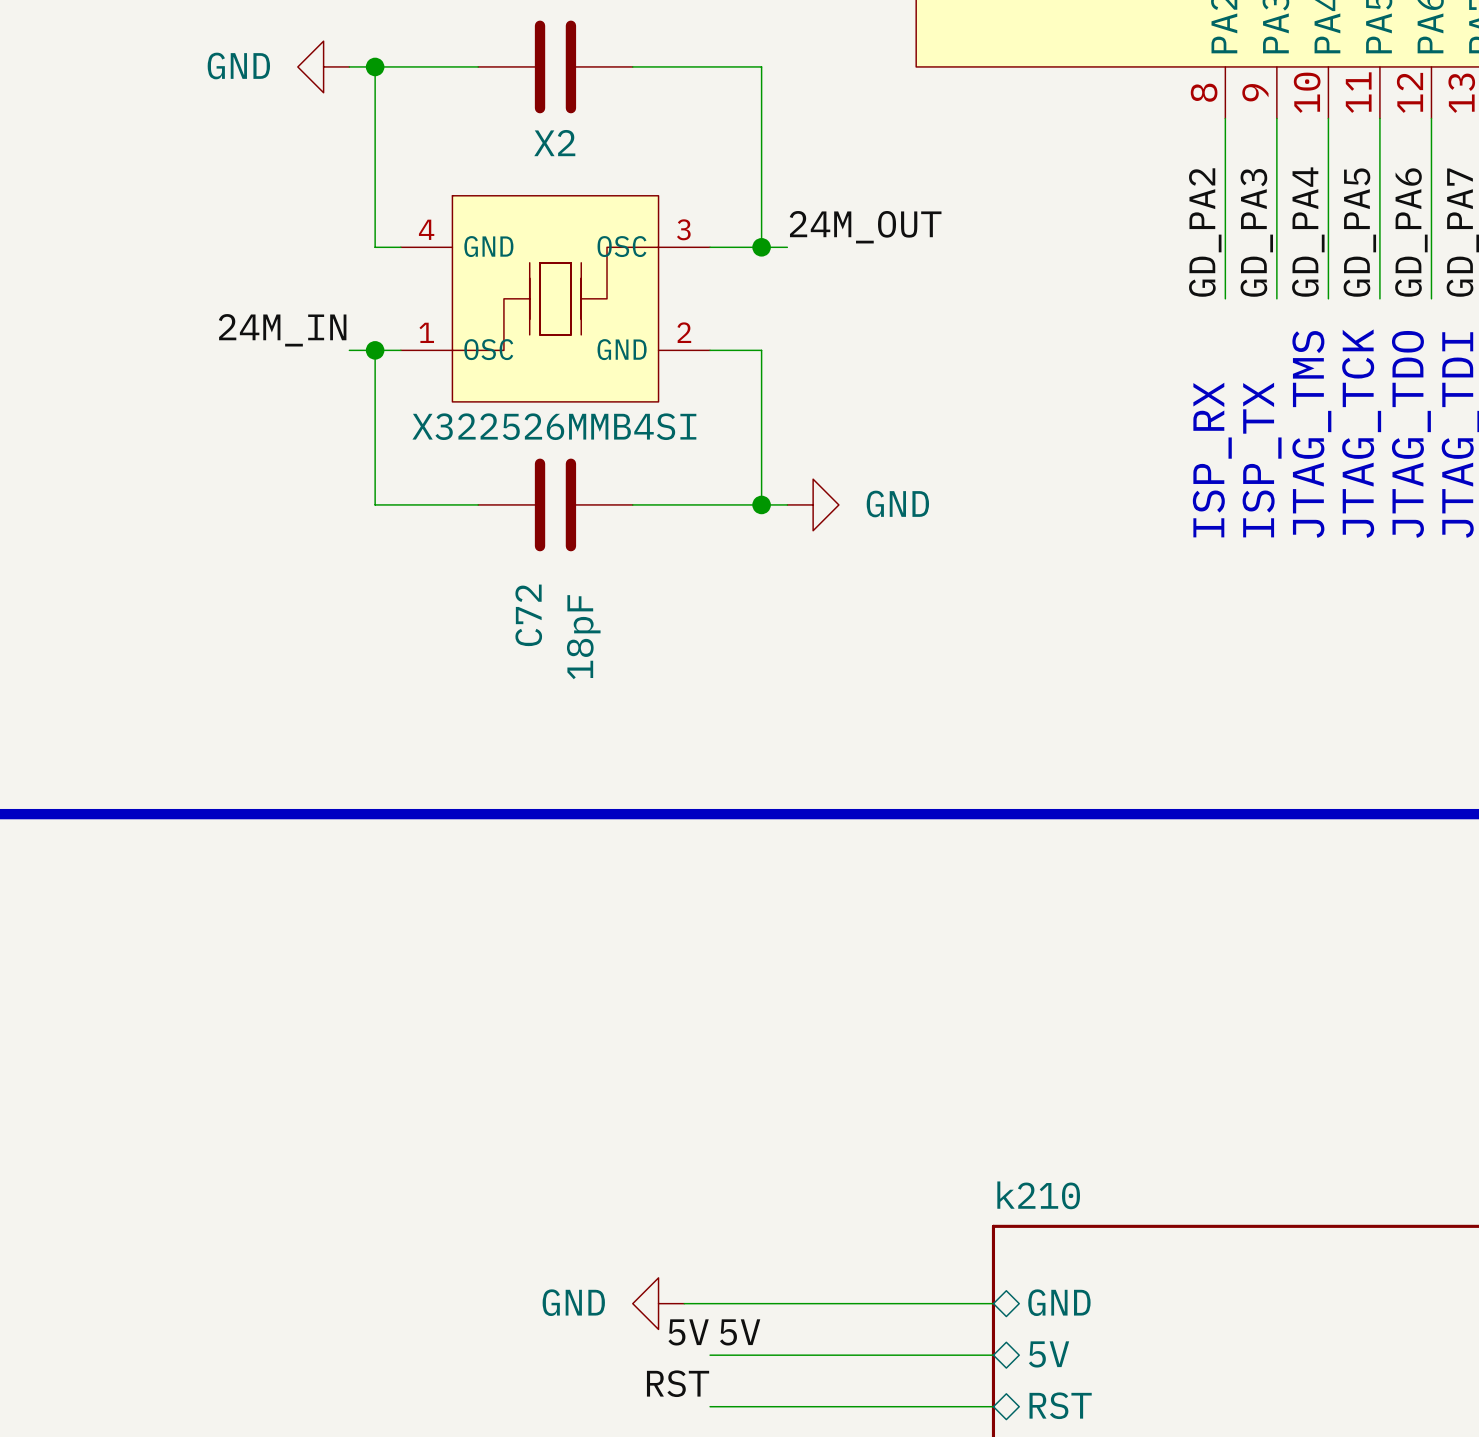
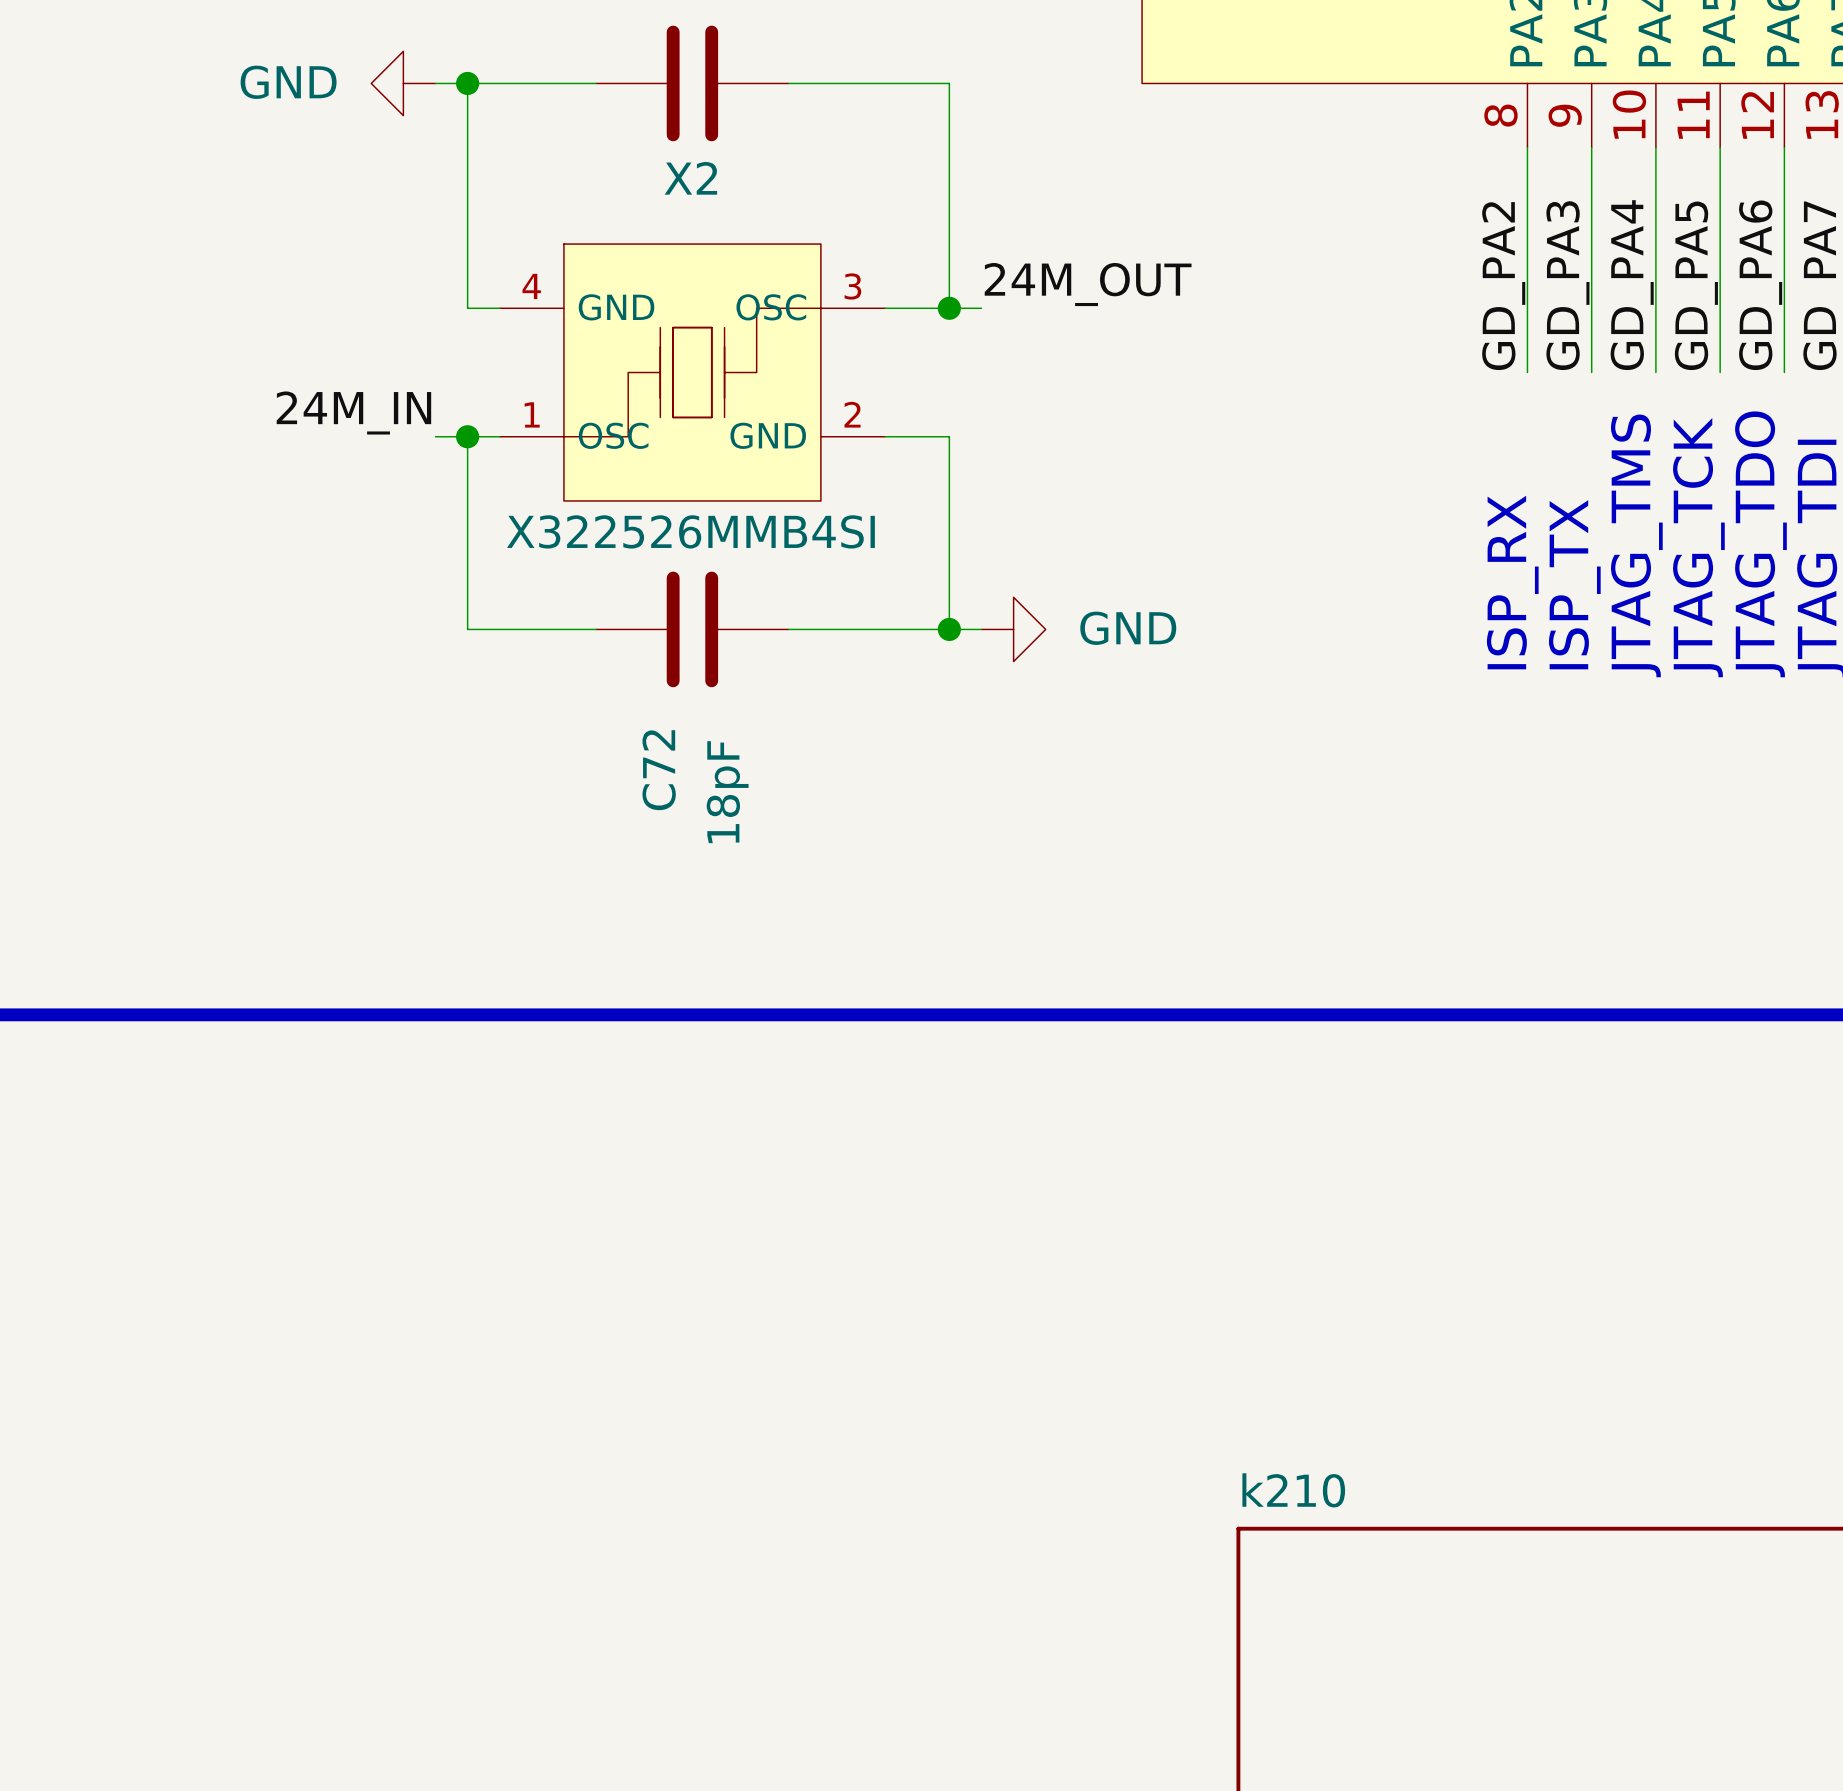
sheet pin: GND (1059, 1302) -> none
power symbol: GND (658, 1303) -> none
wire: (684, 1303) (993, 1303) -> none
label: 5V (688, 1332) -> none
label: 5V (740, 1332) -> none
sheet pin: 5V (1049, 1354) -> none
wire: (710, 1355) (993, 1355) -> none
label: RST (678, 1383) -> none
sheet pin: RST (1060, 1405) -> none
wire: (710, 1406) (993, 1406) -> none

